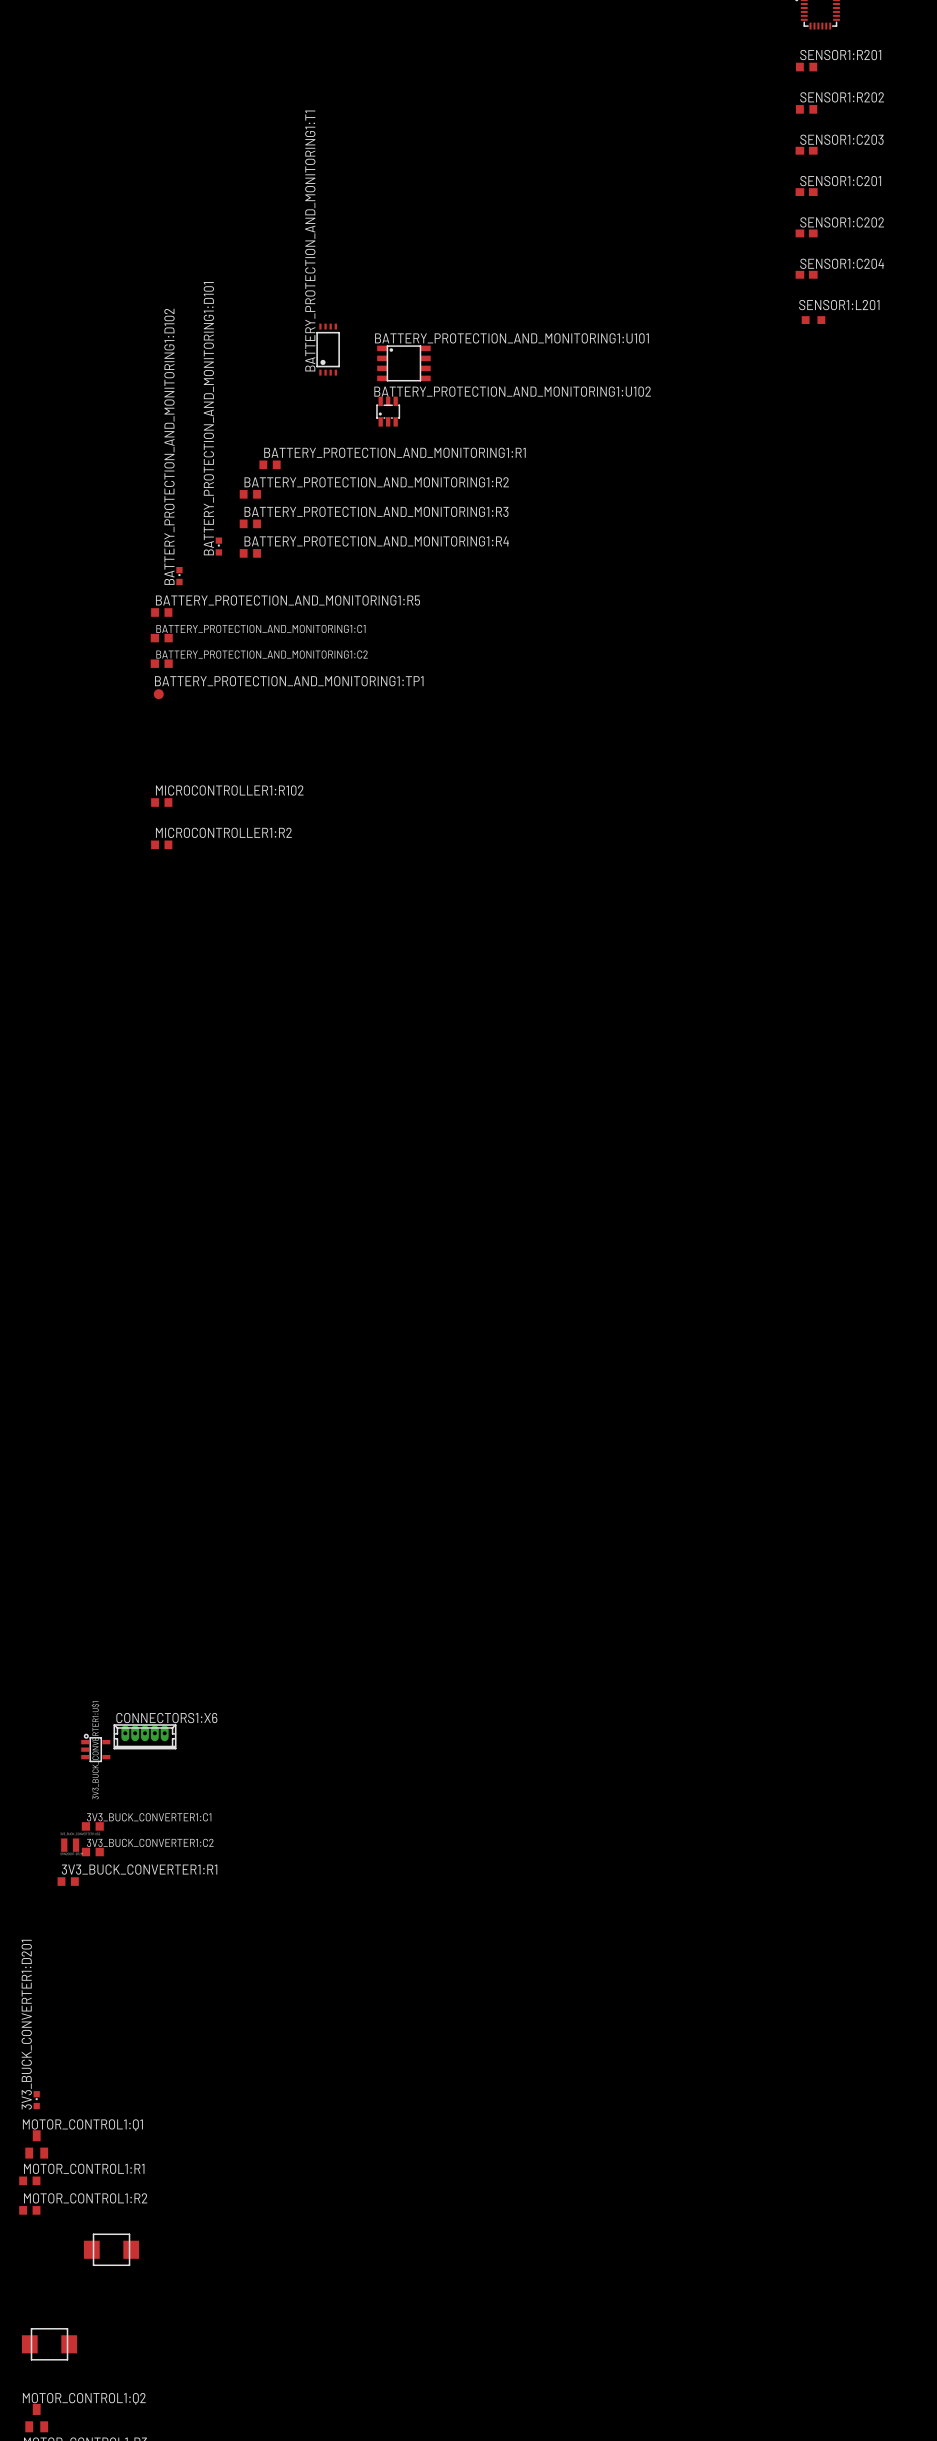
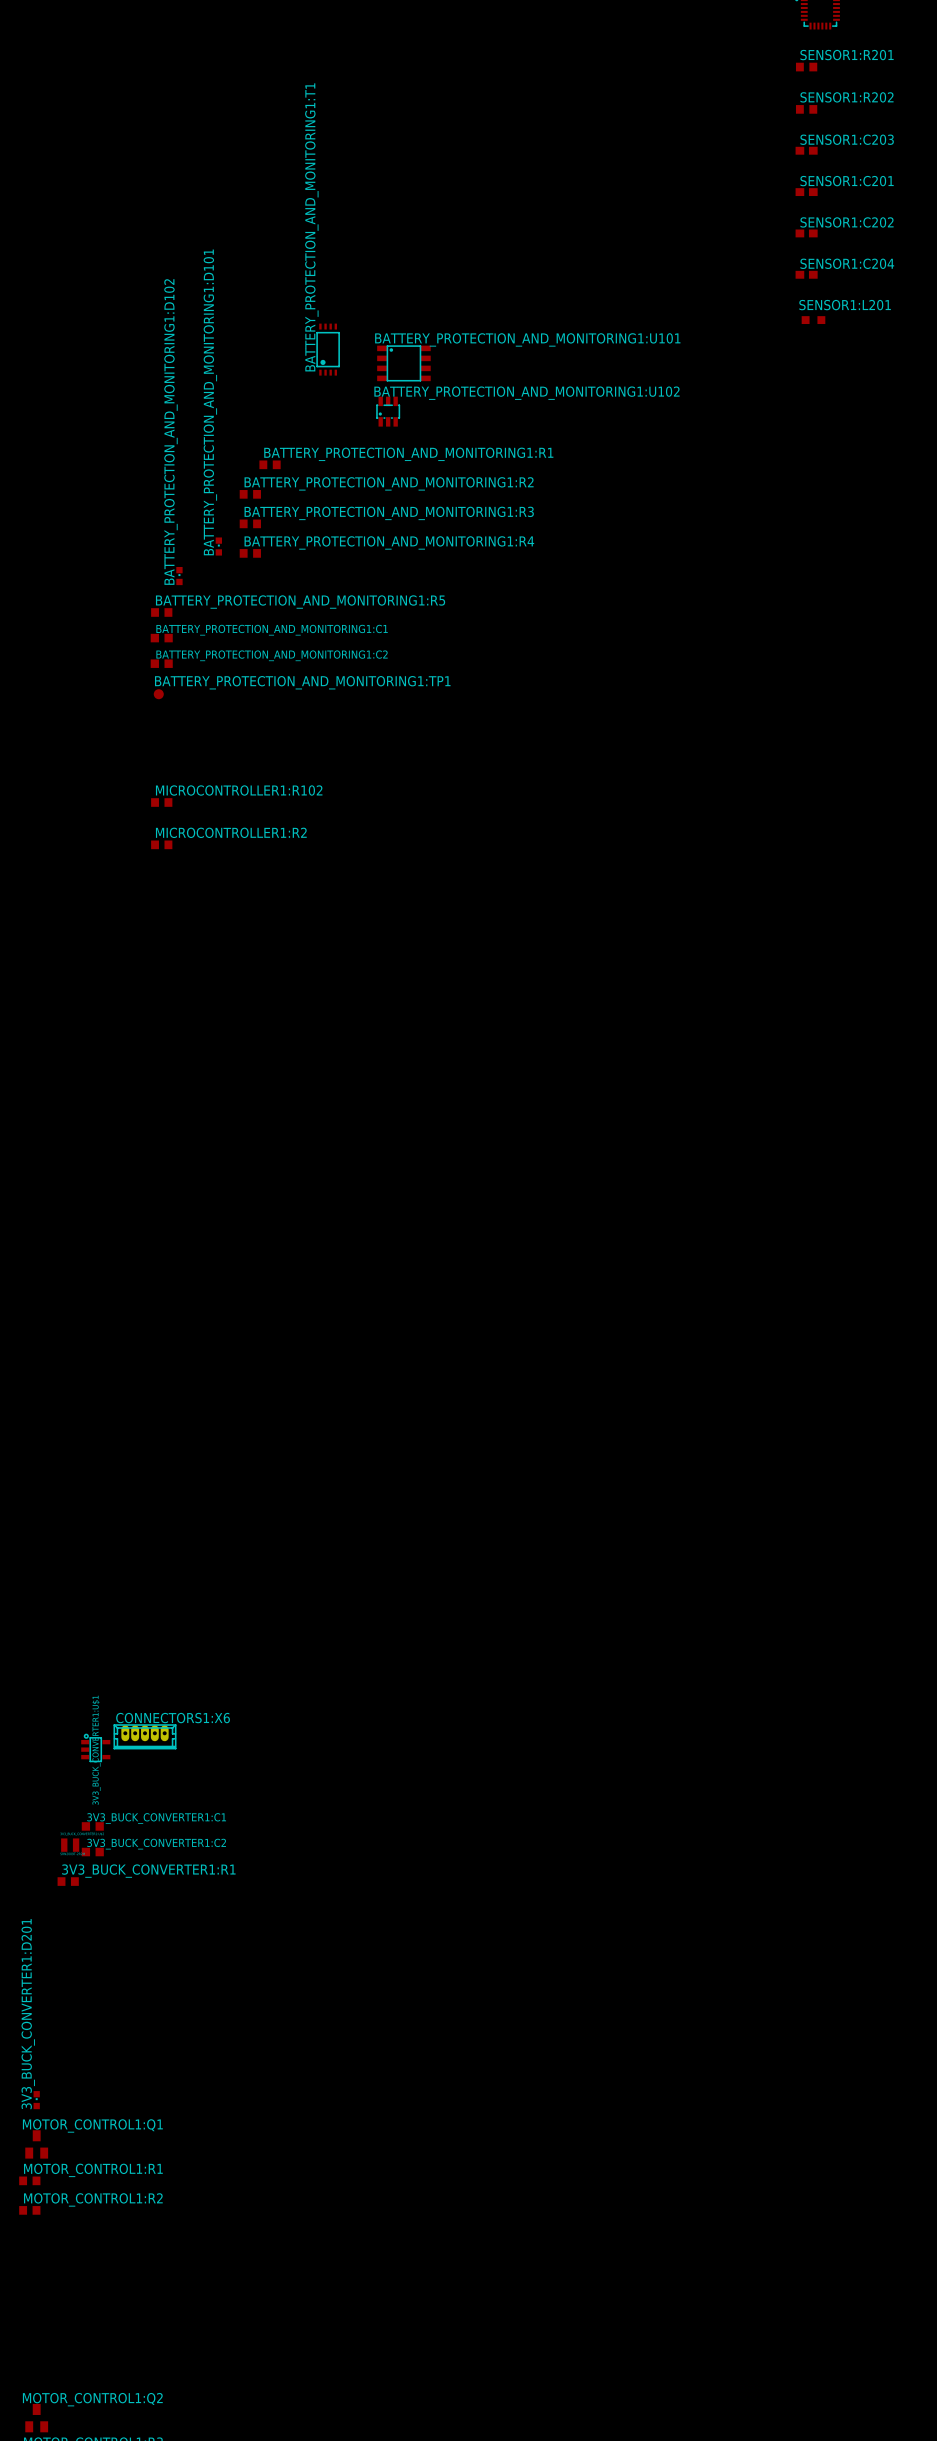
part: (111, 2249) -> none
part: (49, 2344) -> none

